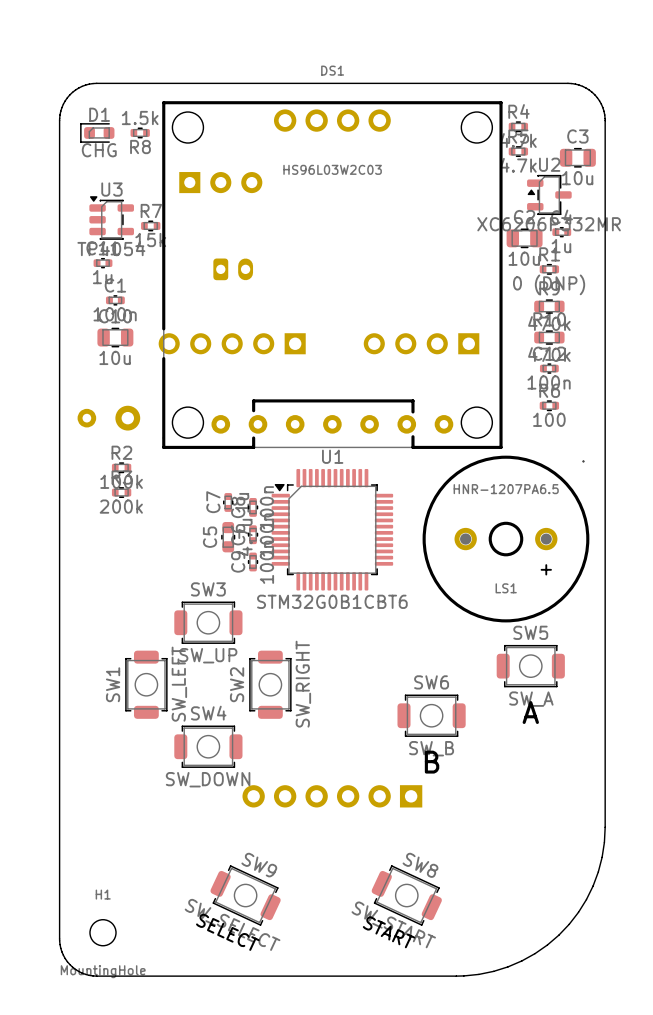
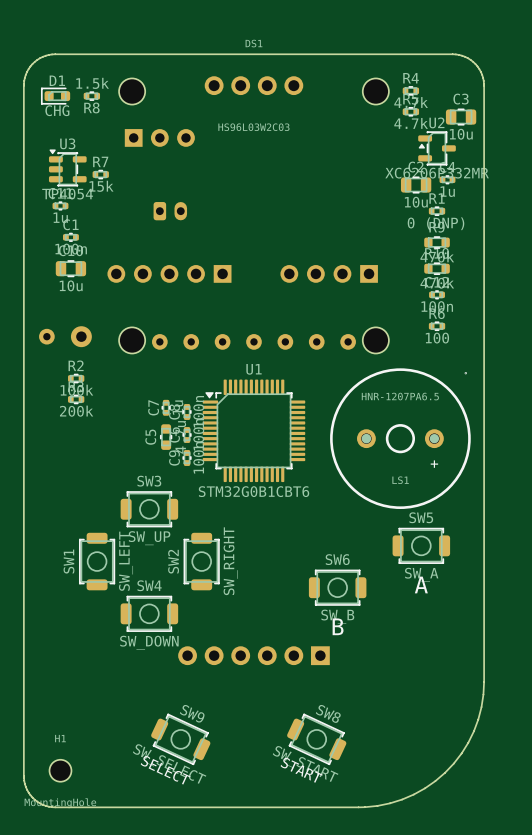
DS1 footprint: [162, 101, 503, 449] -> [119, 76, 389, 354]

